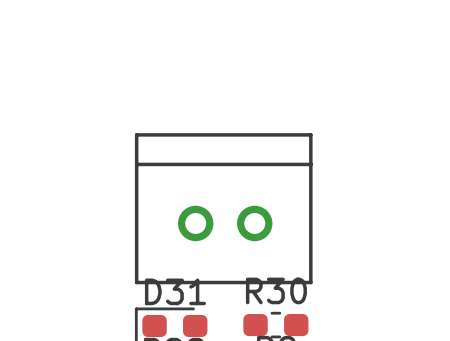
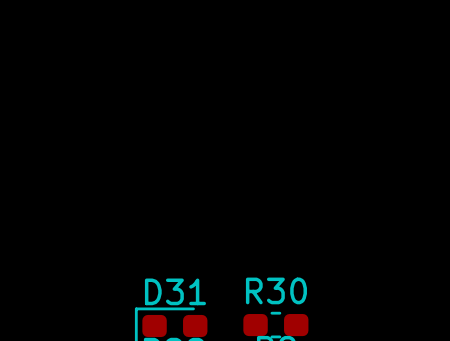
part: (223, 208) -> none

